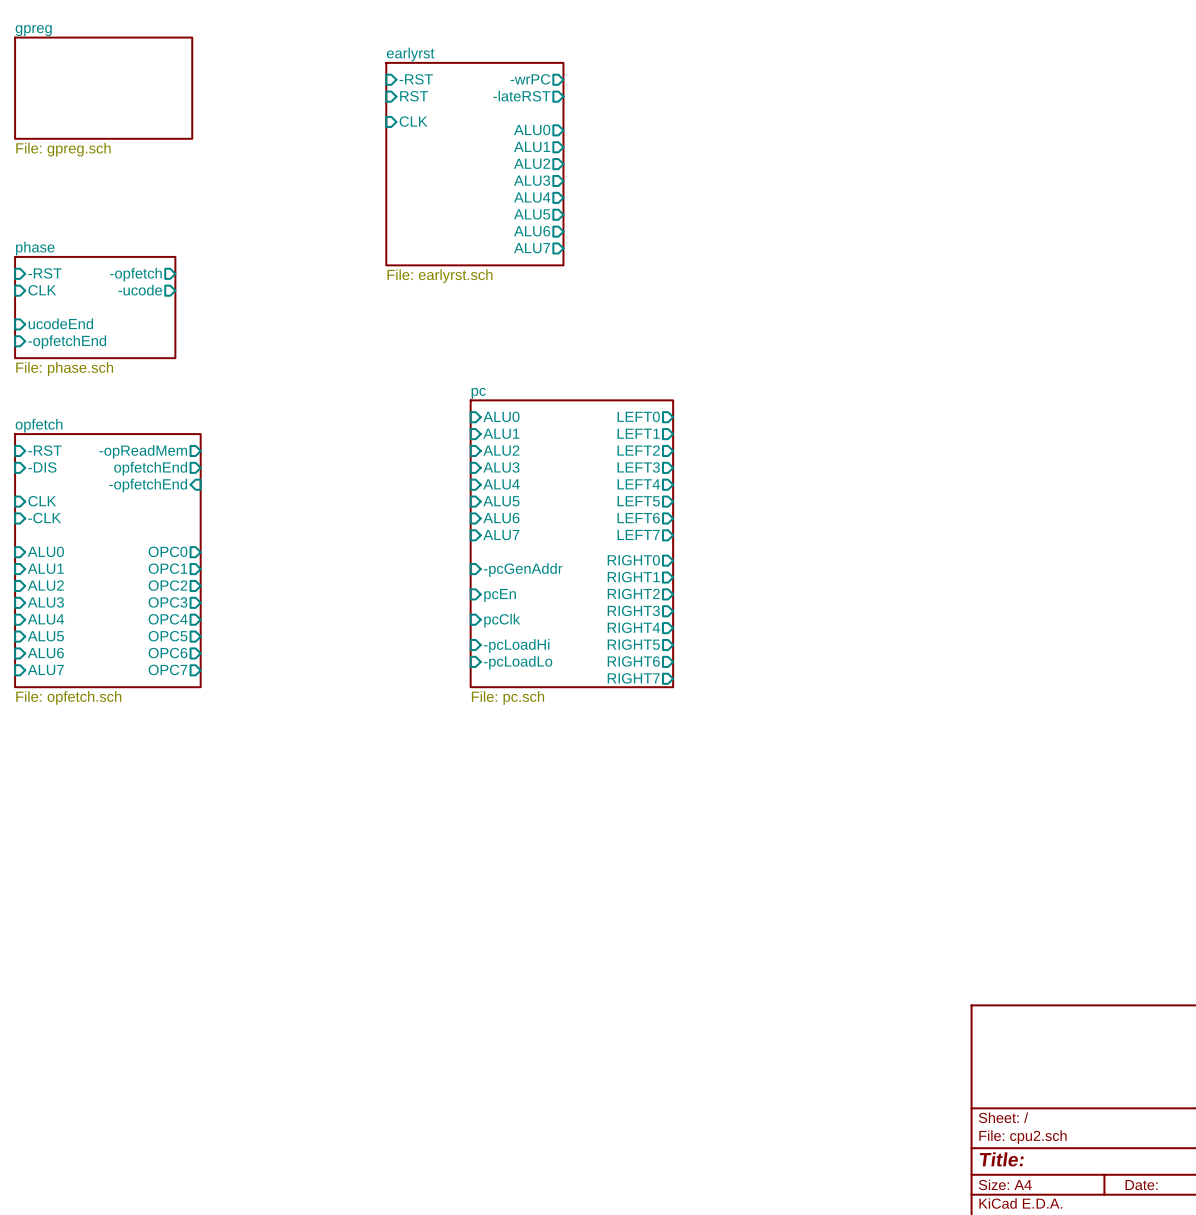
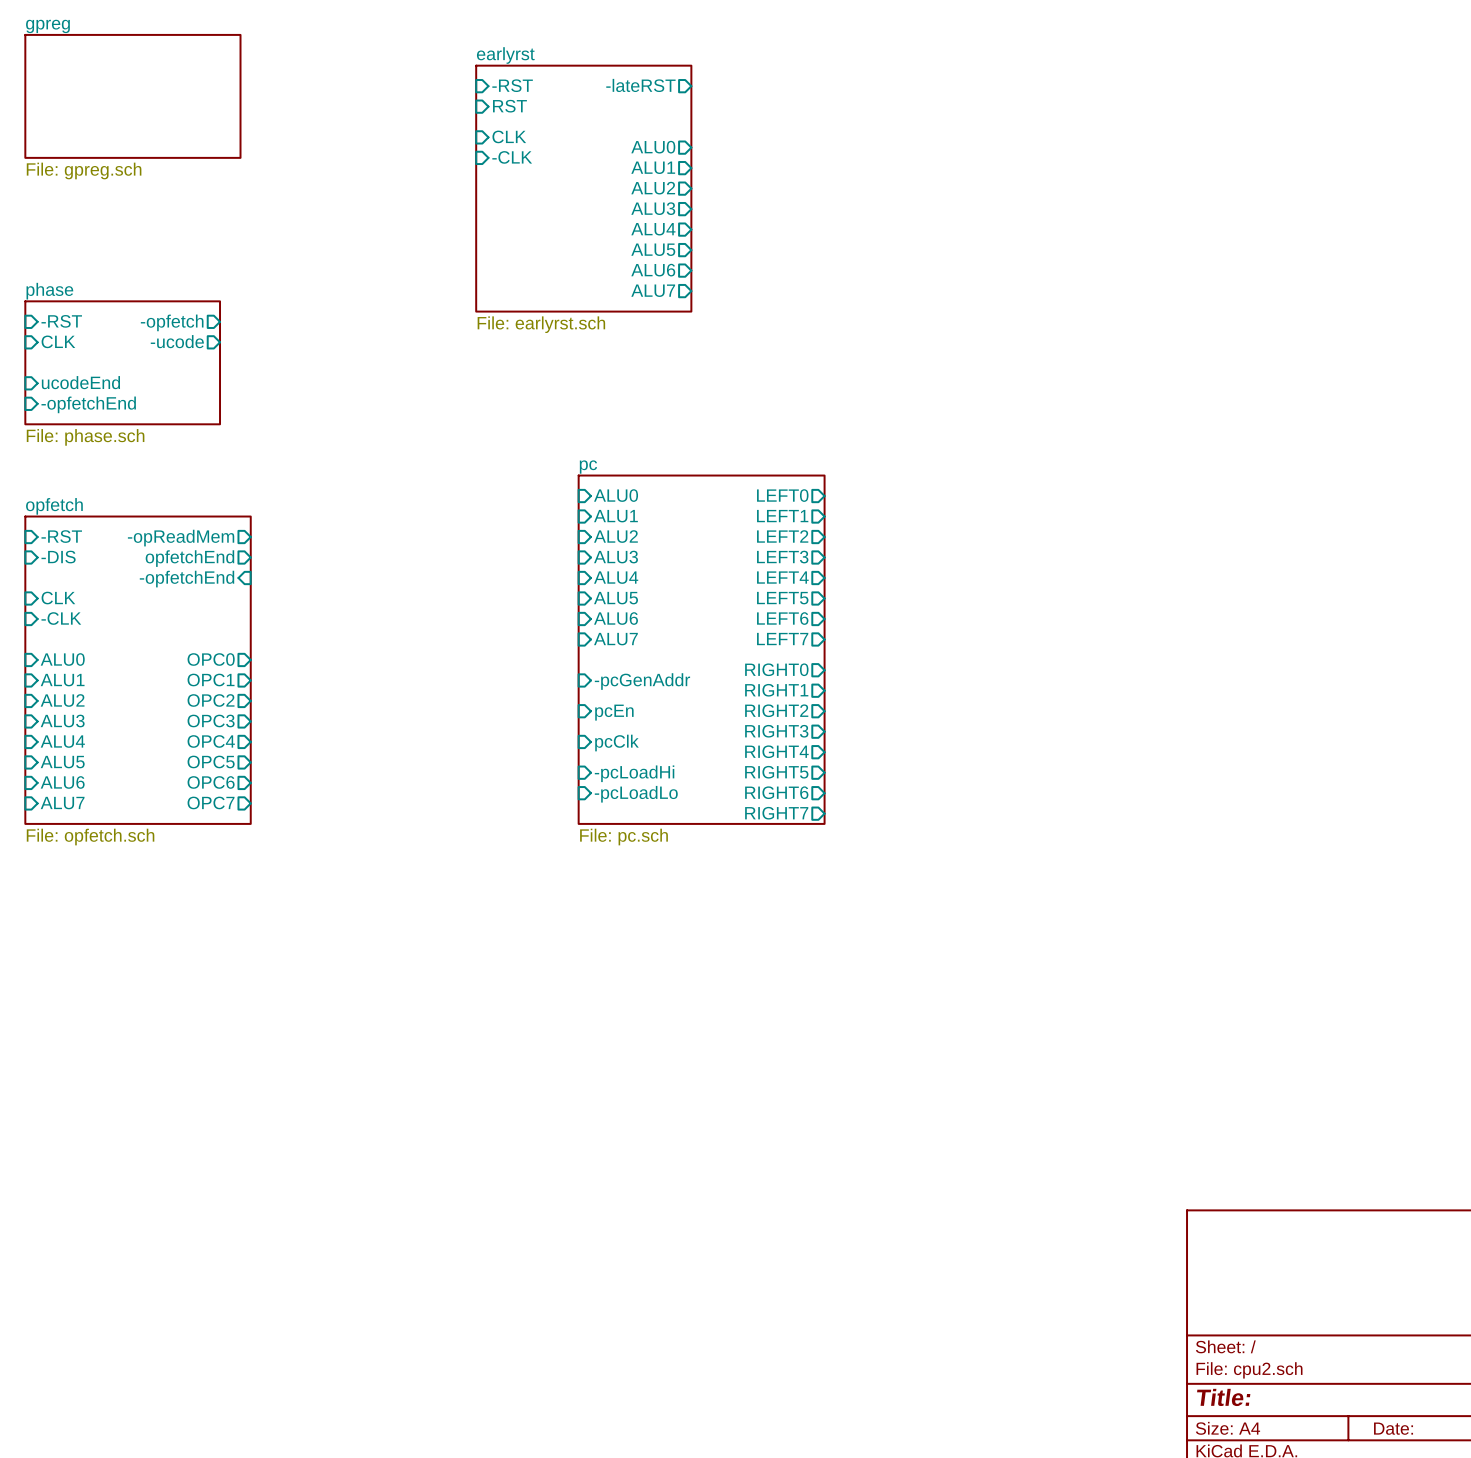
sheet pin: -wrPC (530, 79) -> -lateRST (640, 85)
sheet pin: -lateRST (521, 96) -> none
sheet pin: none -> -CLK (512, 157)

